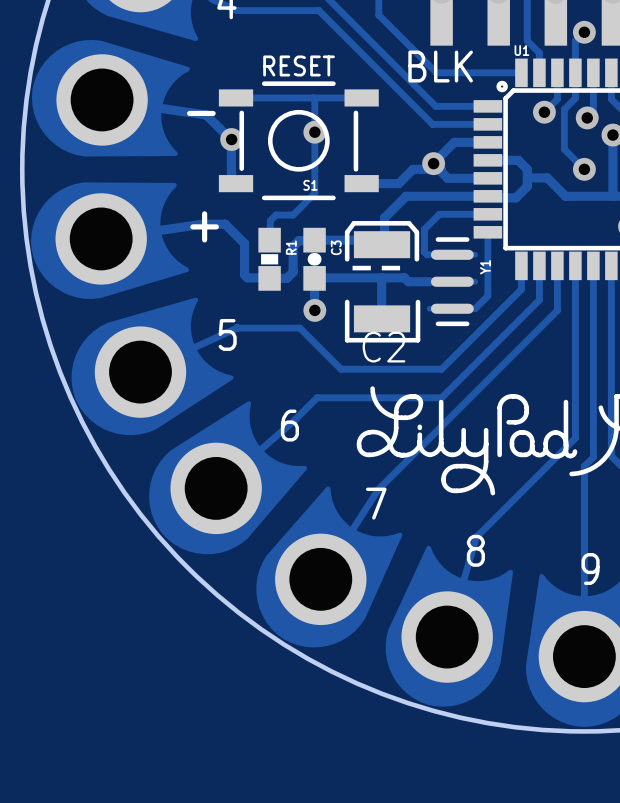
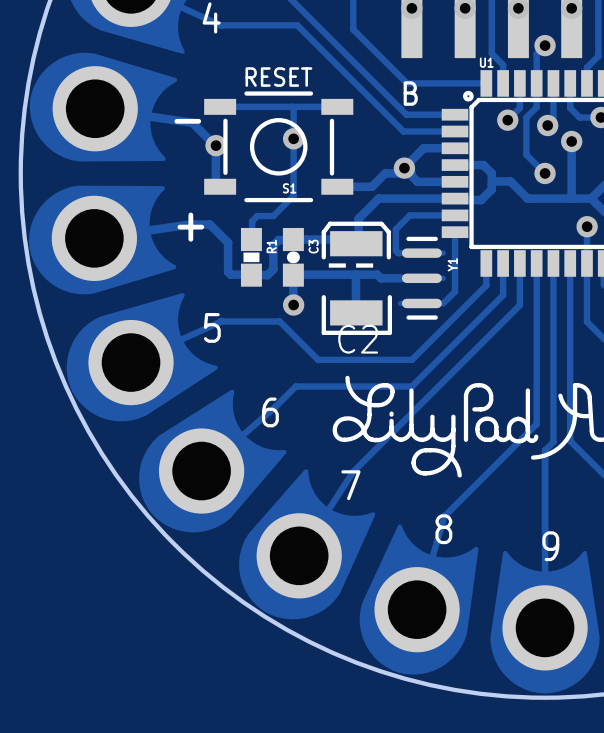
text: BLK (440, 66) -> none
text: none -> B (410, 93)

